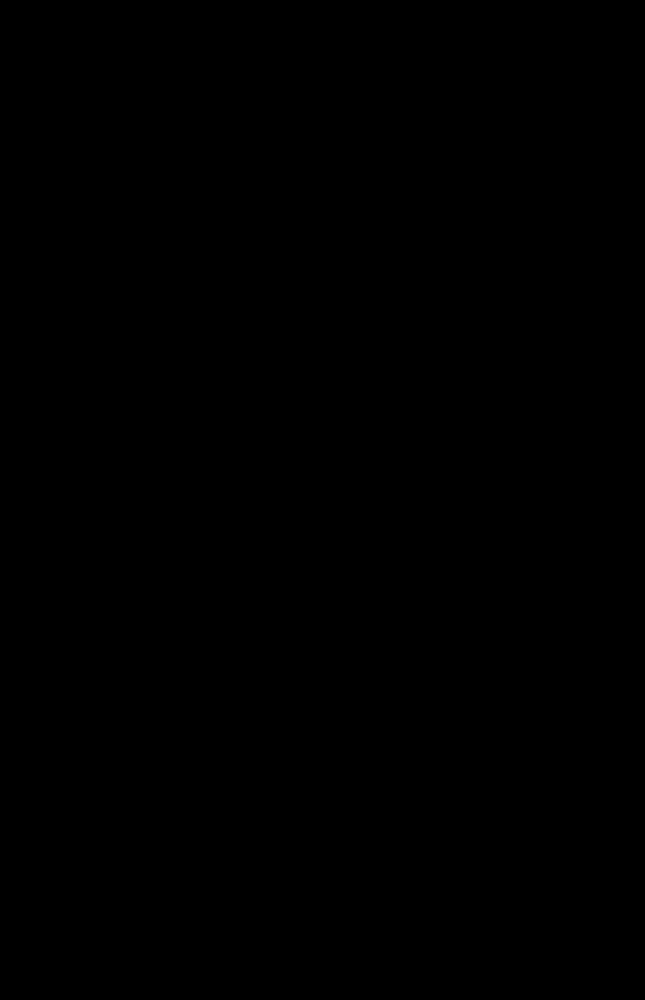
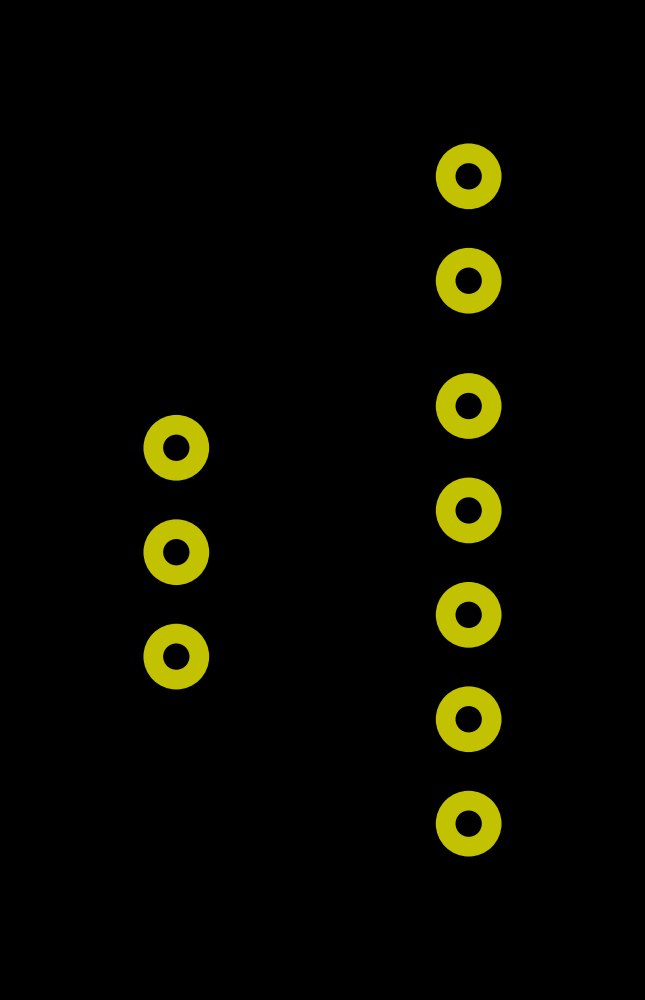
part: none -> (468, 343)
part: none -> (176, 552)
part: none -> (468, 719)

